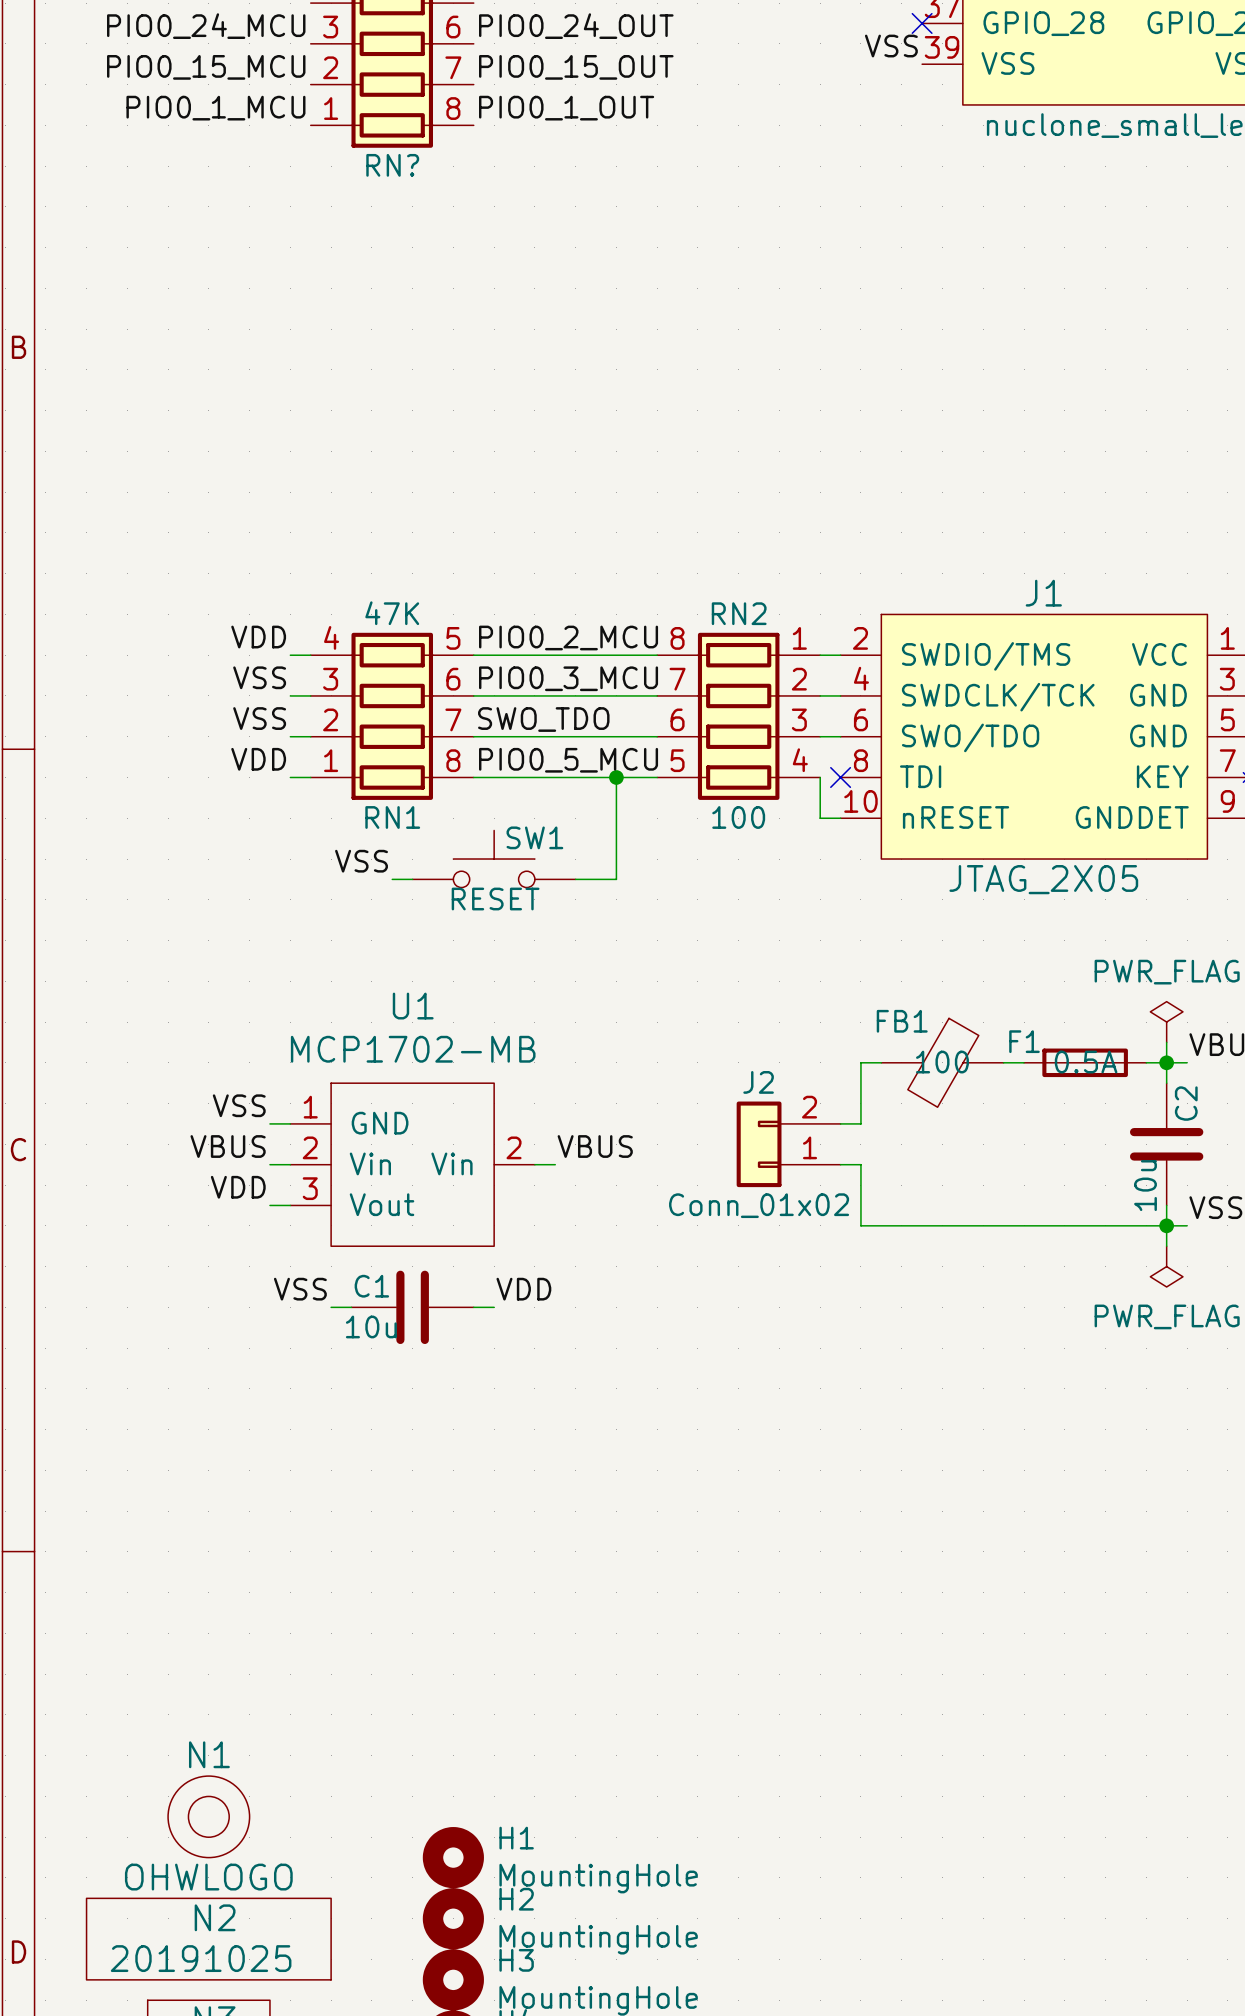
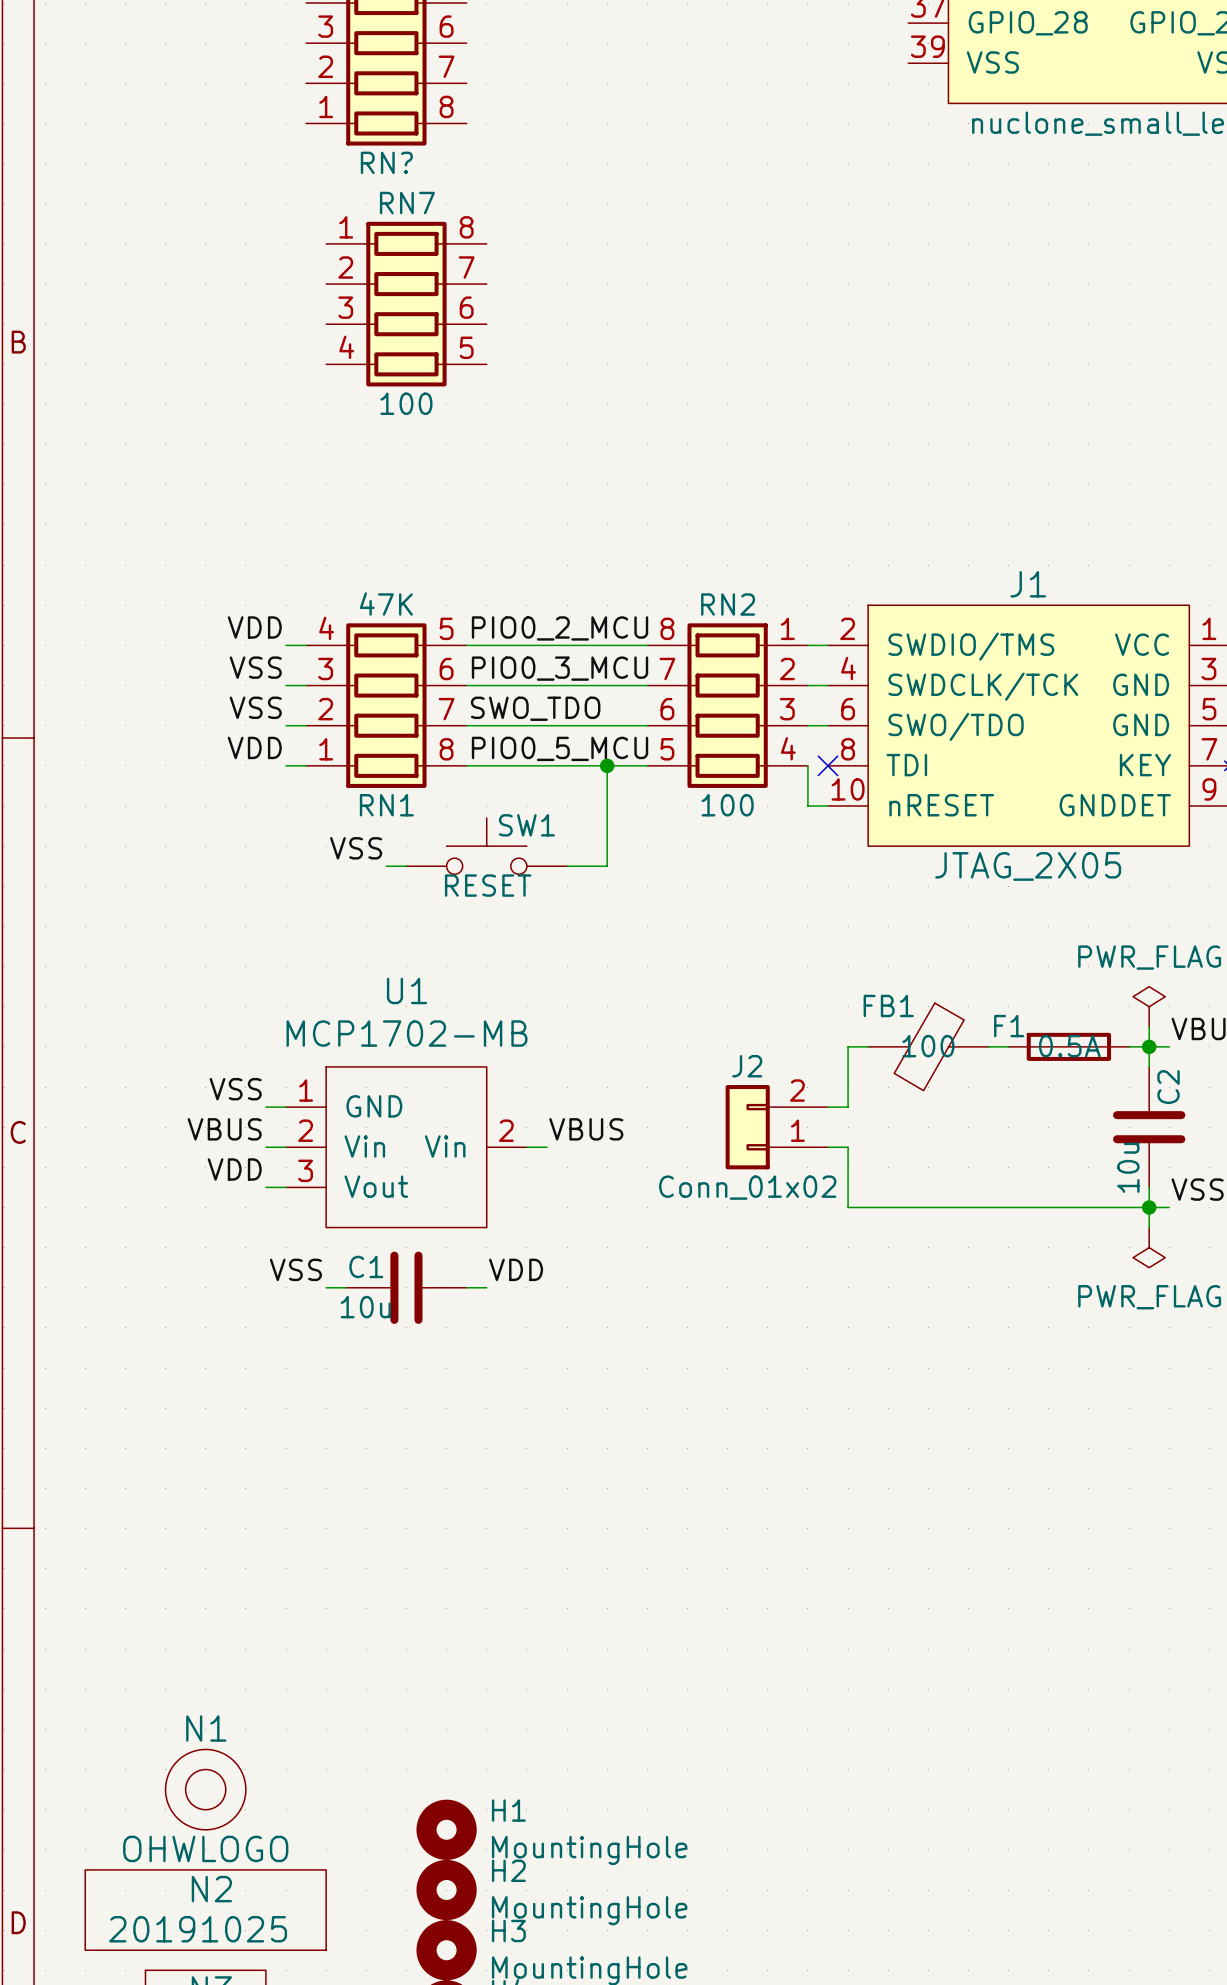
no-connect mark: (922, 23) -> none
label: PIO0_24_MCU (206, 26) -> none
label: PIO0_24_OUT (576, 26) -> none
label: VSS (891, 46) -> none
label: PIO0_15_MCU (206, 67) -> none
label: PIO0_15_OUT (576, 67) -> none
label: PIO0_1_MCU (215, 108) -> none
label: PIO0_1_OUT (566, 108) -> none
RN7: none -> 100 (406, 304)

